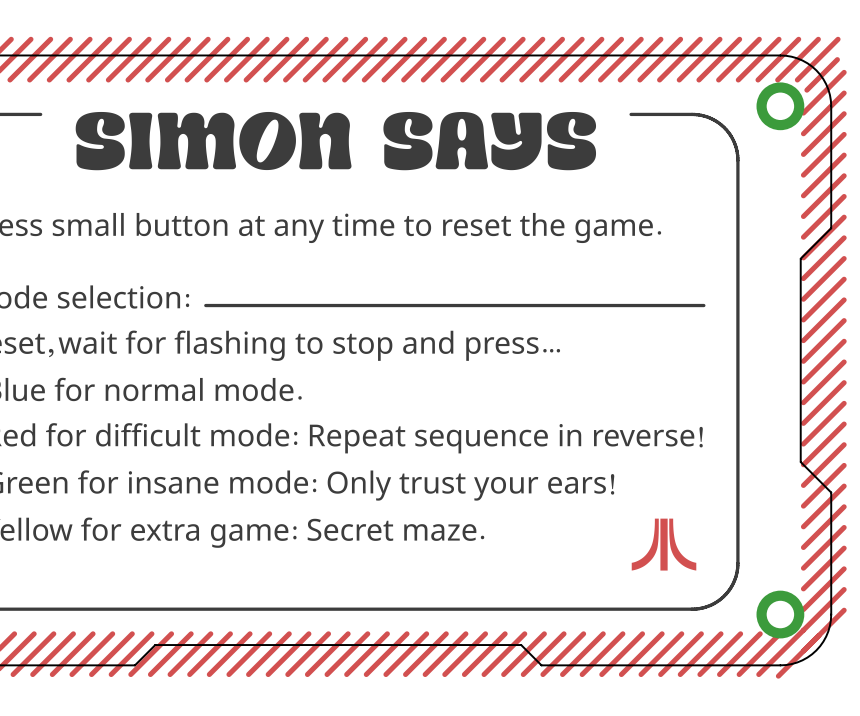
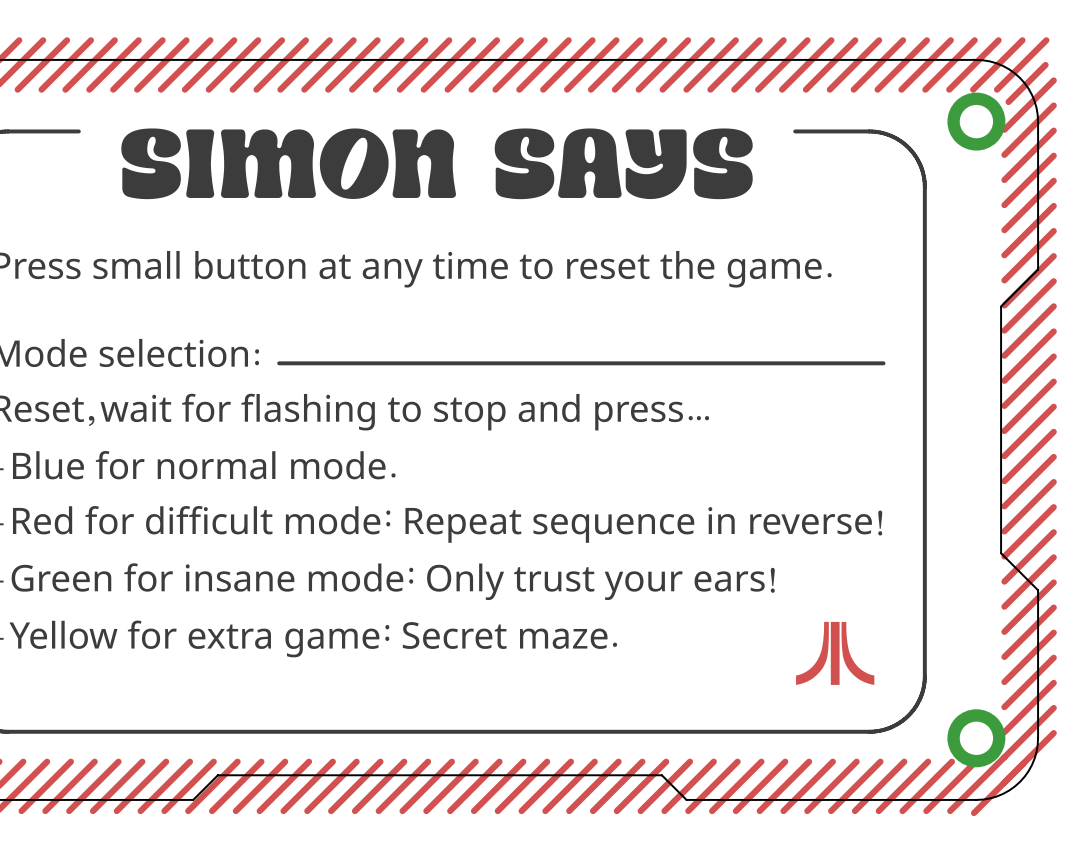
drawing: none -> [386, 510, 391, 527]
drawing: [294, 431, 298, 445] -> none
drawing: none -> [409, 567, 414, 584]
drawing: [312, 479, 317, 493] -> none
drawing: none -> [385, 625, 390, 641]
drawing: [293, 526, 297, 540] -> none

